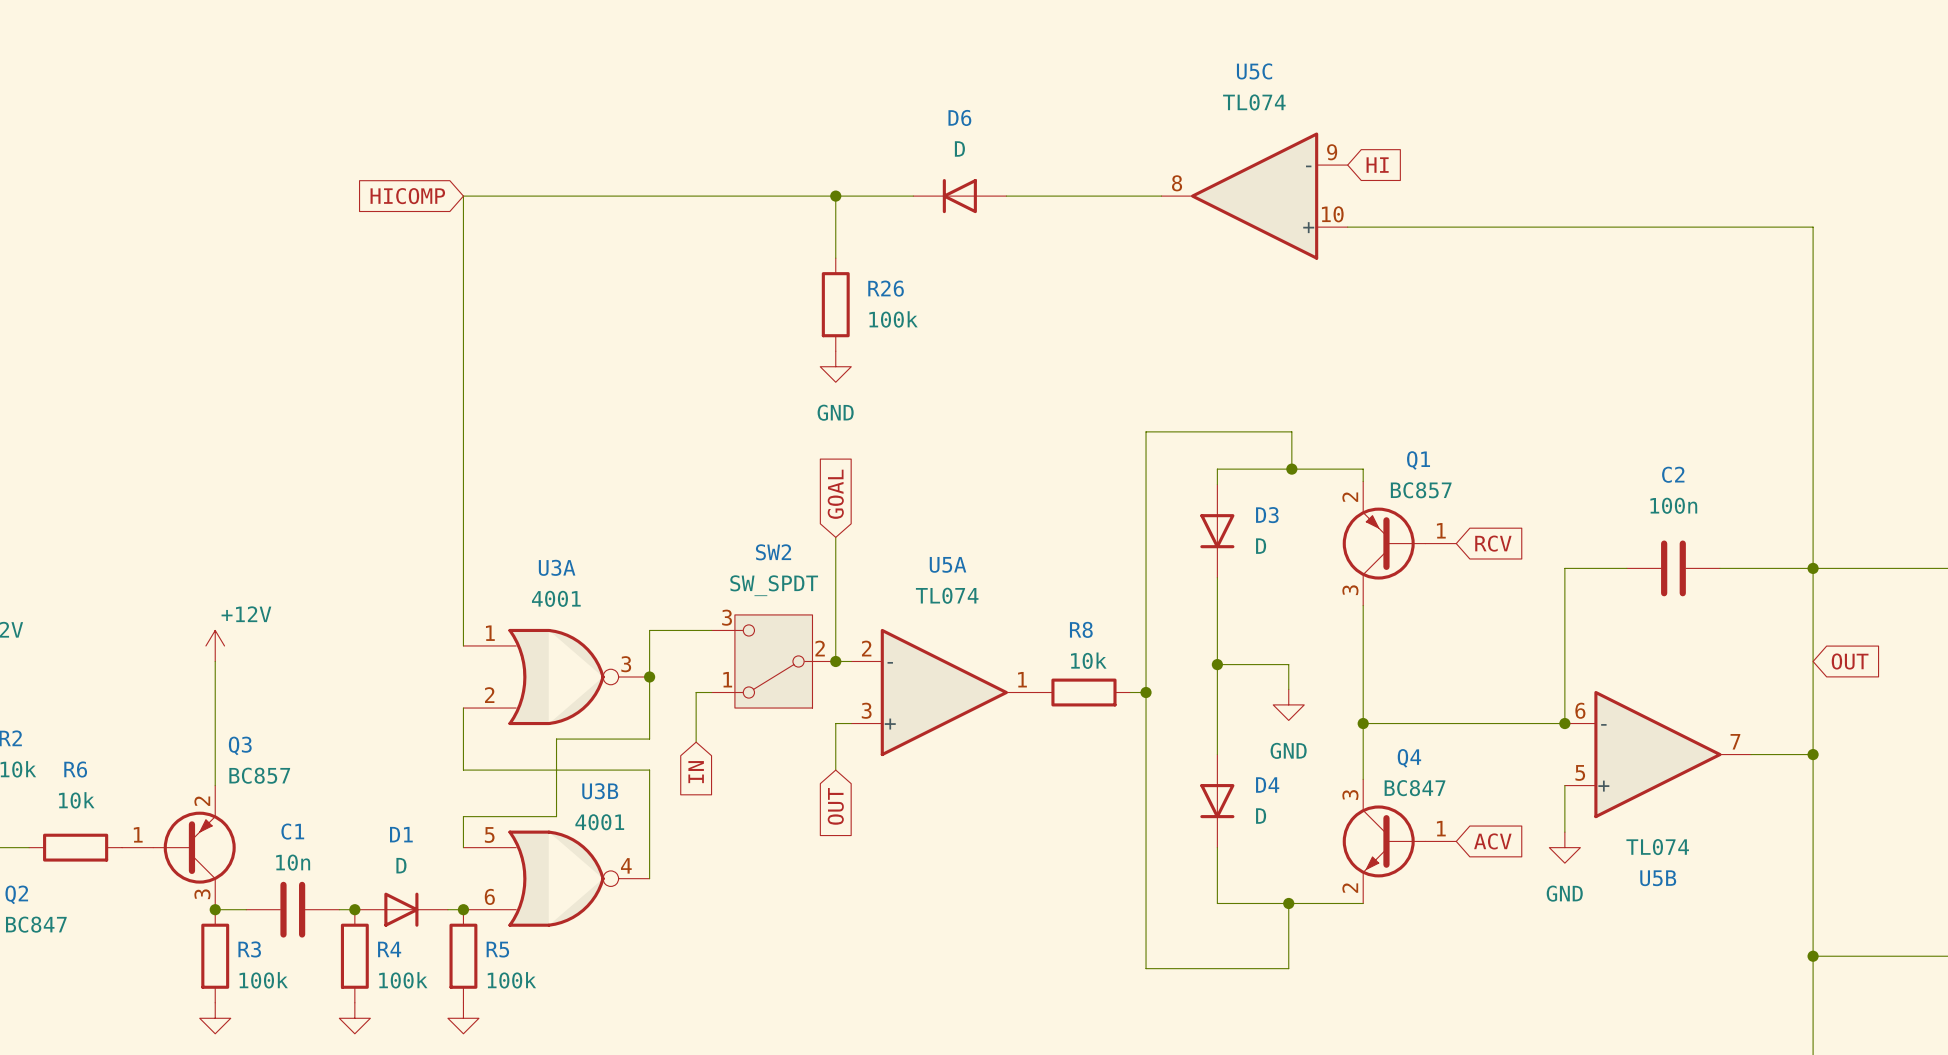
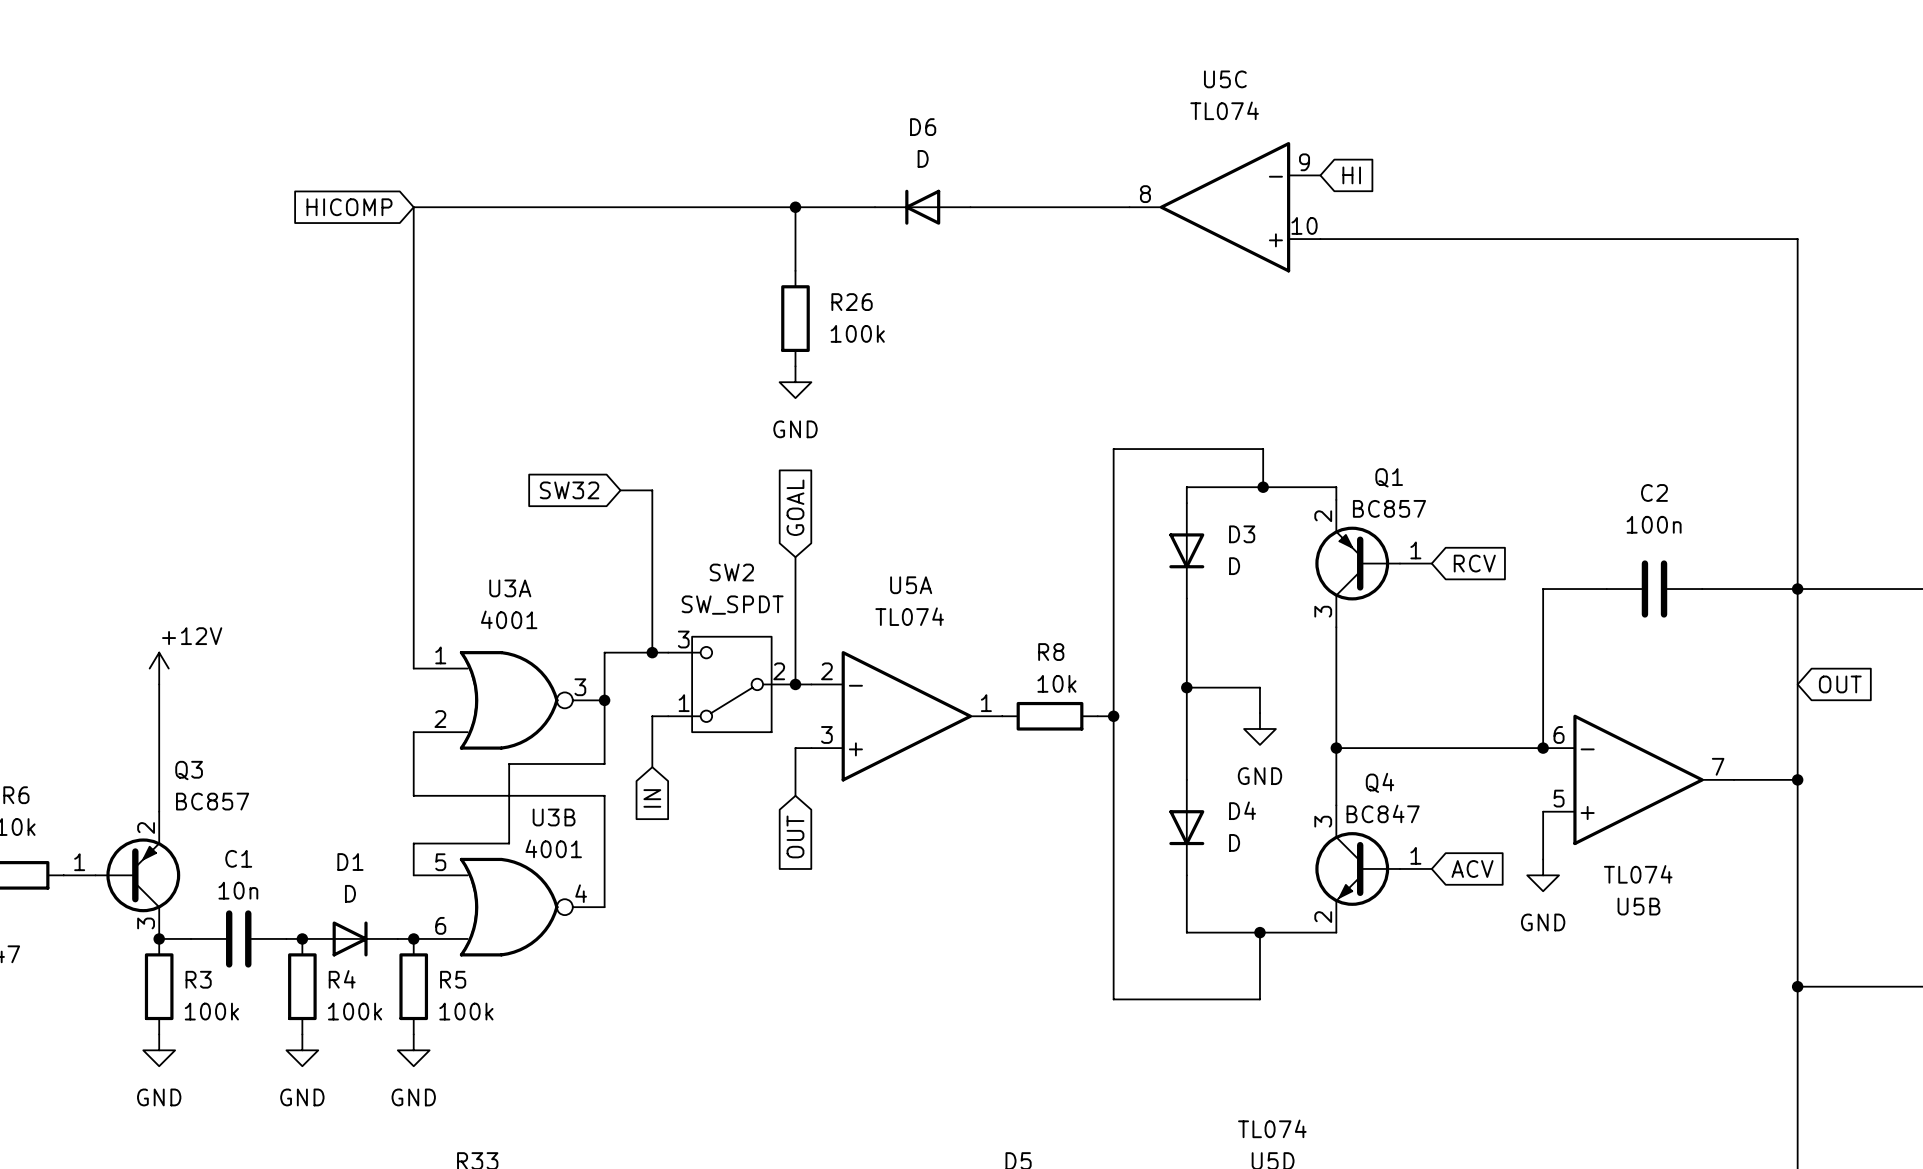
global label: none -> SW32 (569, 490)
wire: none -> (620, 490) (652, 490) (652, 652)
junction: none -> (652, 652)

